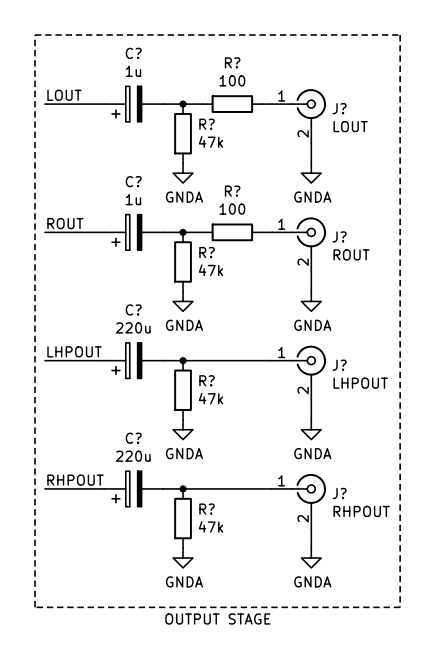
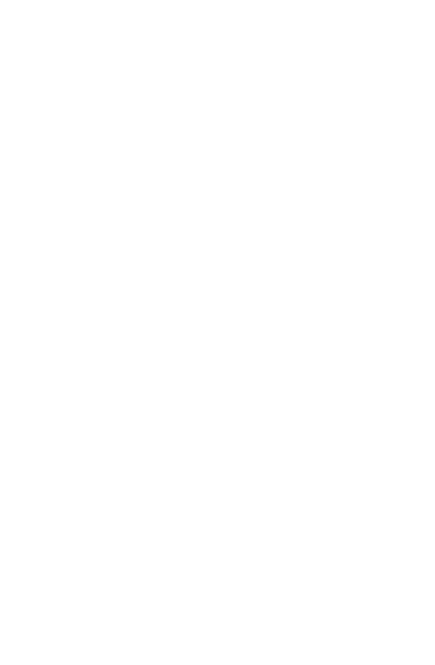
line: (35, 35) (400, 35) (400, 607) (35, 607) (35, 35) -> none
label: LOUT (64, 95) -> none
wire: (44, 104) (104, 104) -> none
C?: 1u (133, 104) -> none
wire: (163, 104) (202, 104) -> none
junction: (183, 104) -> none
R?: 100 (232, 104) -> none
wire: (261, 104) (271, 104) -> none
J?: LOUT (298, 116) -> none
R?: 47k (183, 133) -> none
wire: (311, 143) (311, 163) -> none
power symbol: GNDA (183, 173) -> none
power symbol: GNDA (311, 173) -> none
label: ROUT (65, 223) -> none
wire: (44, 232) (104, 232) -> none
C?: 1u (133, 232) -> none
wire: (163, 232) (202, 232) -> none
junction: (183, 232) -> none
R?: 100 (232, 232) -> none
wire: (261, 232) (271, 232) -> none
J?: ROUT (298, 244) -> none
R?: 47k (183, 261) -> none
wire: (311, 271) (311, 291) -> none
power symbol: GNDA (183, 301) -> none
power symbol: GNDA (311, 301) -> none
label: LHPOUT (74, 351) -> none
wire: (44, 360) (104, 360) -> none
C?: 220u (133, 360) -> none
wire: (163, 360) (271, 360) -> none
junction: (183, 360) -> none
J?: LHPOUT (298, 372) -> none
R?: 47k (183, 390) -> none
wire: (311, 400) (311, 419) -> none
power symbol: GNDA (183, 429) -> none
power symbol: GNDA (311, 429) -> none
label: RHPOUT (75, 480) -> none
wire: (44, 488) (104, 488) -> none
C?: 220u (133, 488) -> none
wire: (163, 488) (271, 488) -> none
junction: (183, 488) -> none
J?: RHPOUT (298, 501) -> none
R?: 47k (183, 518) -> none
wire: (311, 528) (311, 548) -> none
power symbol: GNDA (183, 558) -> none
power symbol: GNDA (311, 558) -> none
text: OUTPUT STAGE (217, 619) -> none

